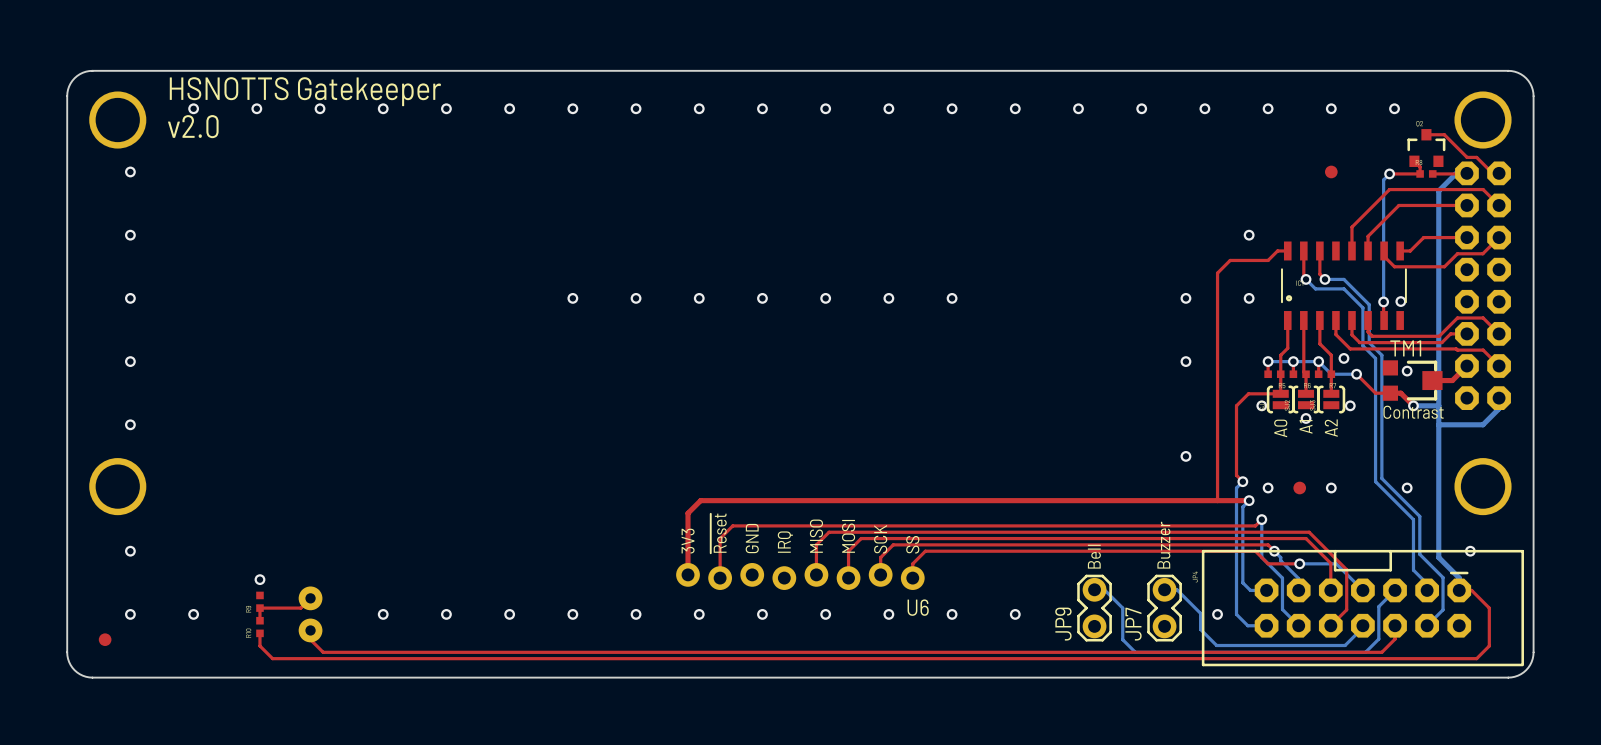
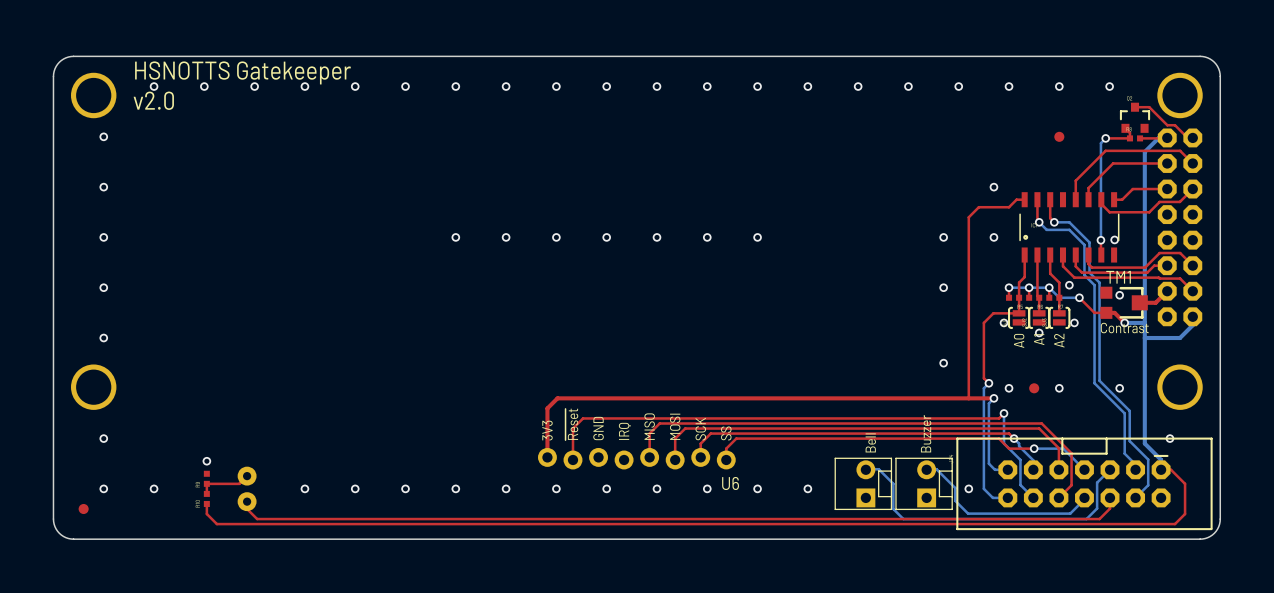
part: none -> (863, 483)
JP9: (1094, 608) -> none
part: none -> (924, 483)
JP7: (1164, 608) -> none

